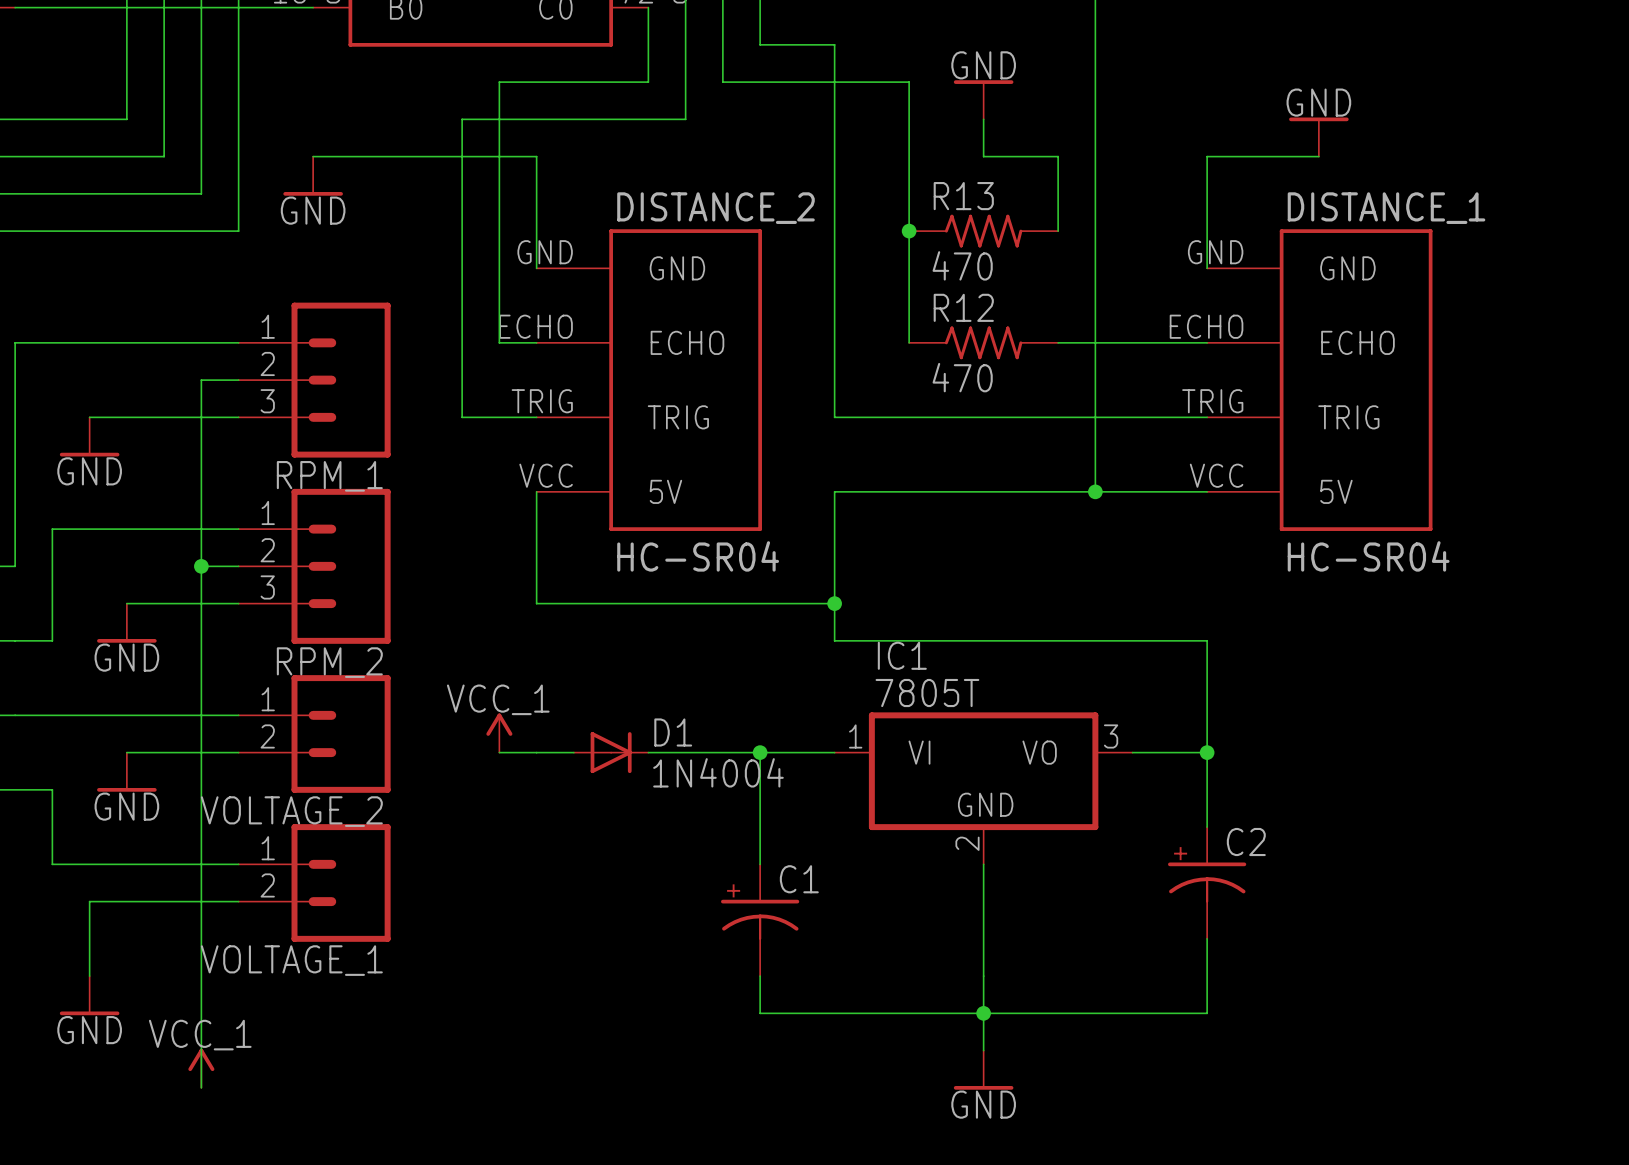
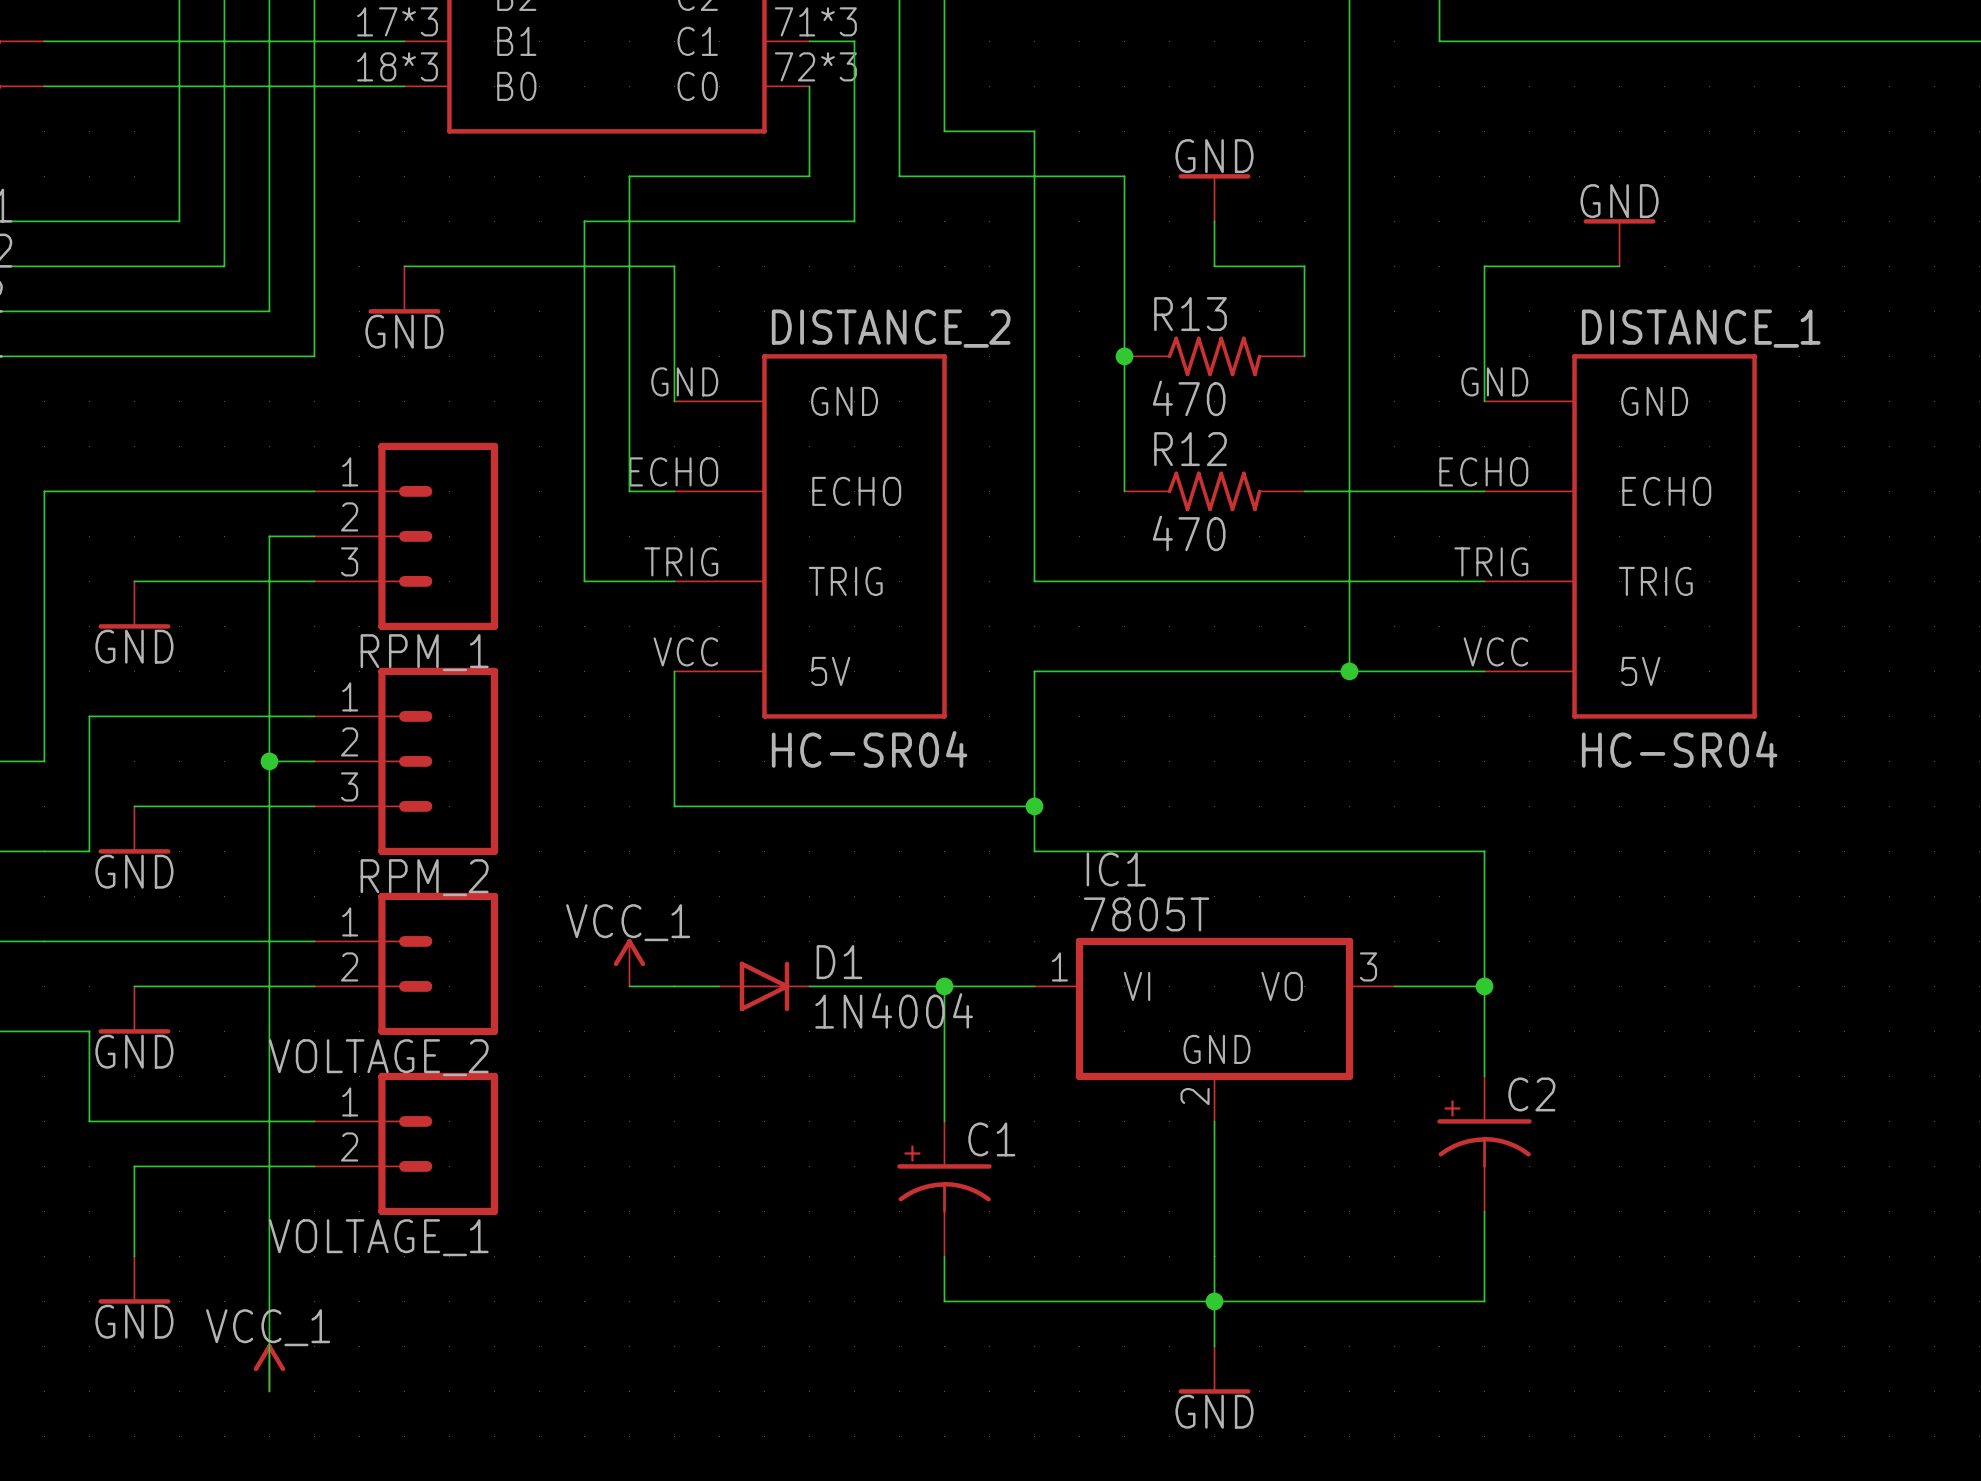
wire: none -> (134, 806) (179, 806)
power symbol position: GND (126, 623) -> GND (134, 830)
wire: none -> (134, 986) (179, 986)
power symbol position: GND (126, 772) -> GND (134, 1010)

